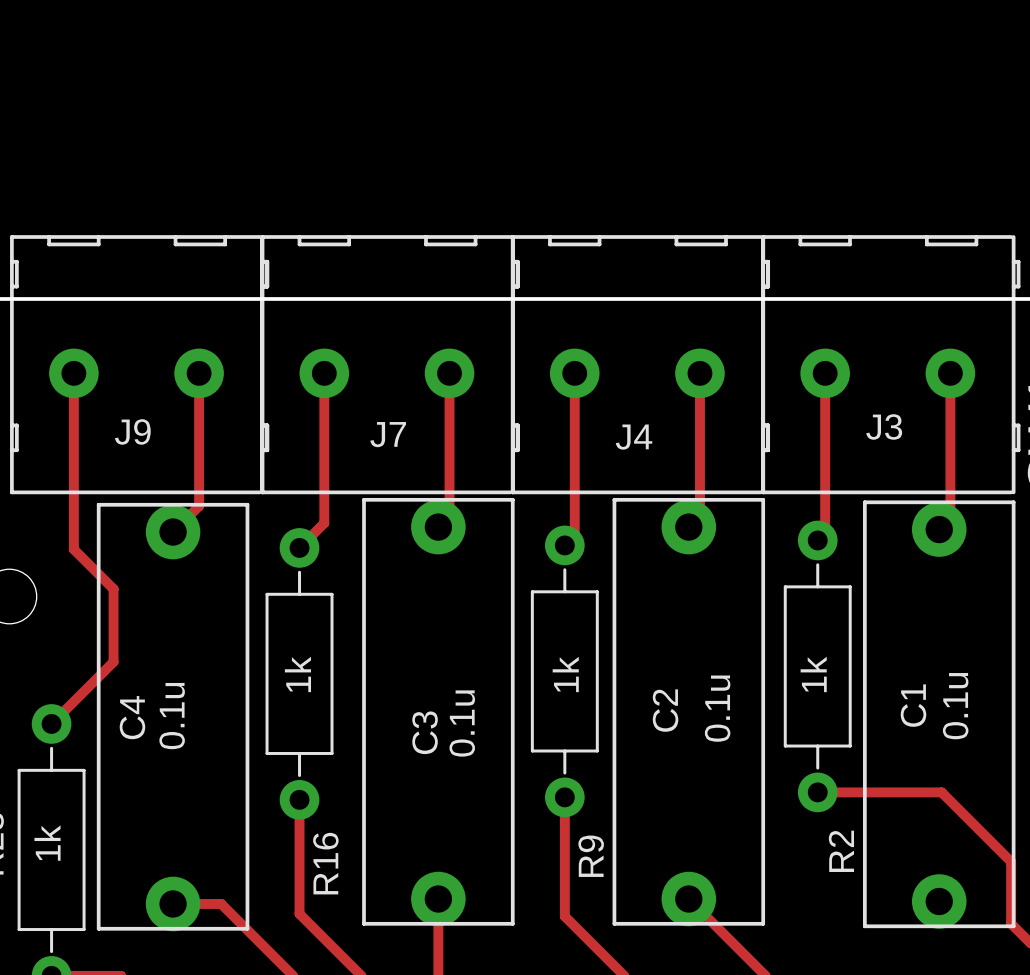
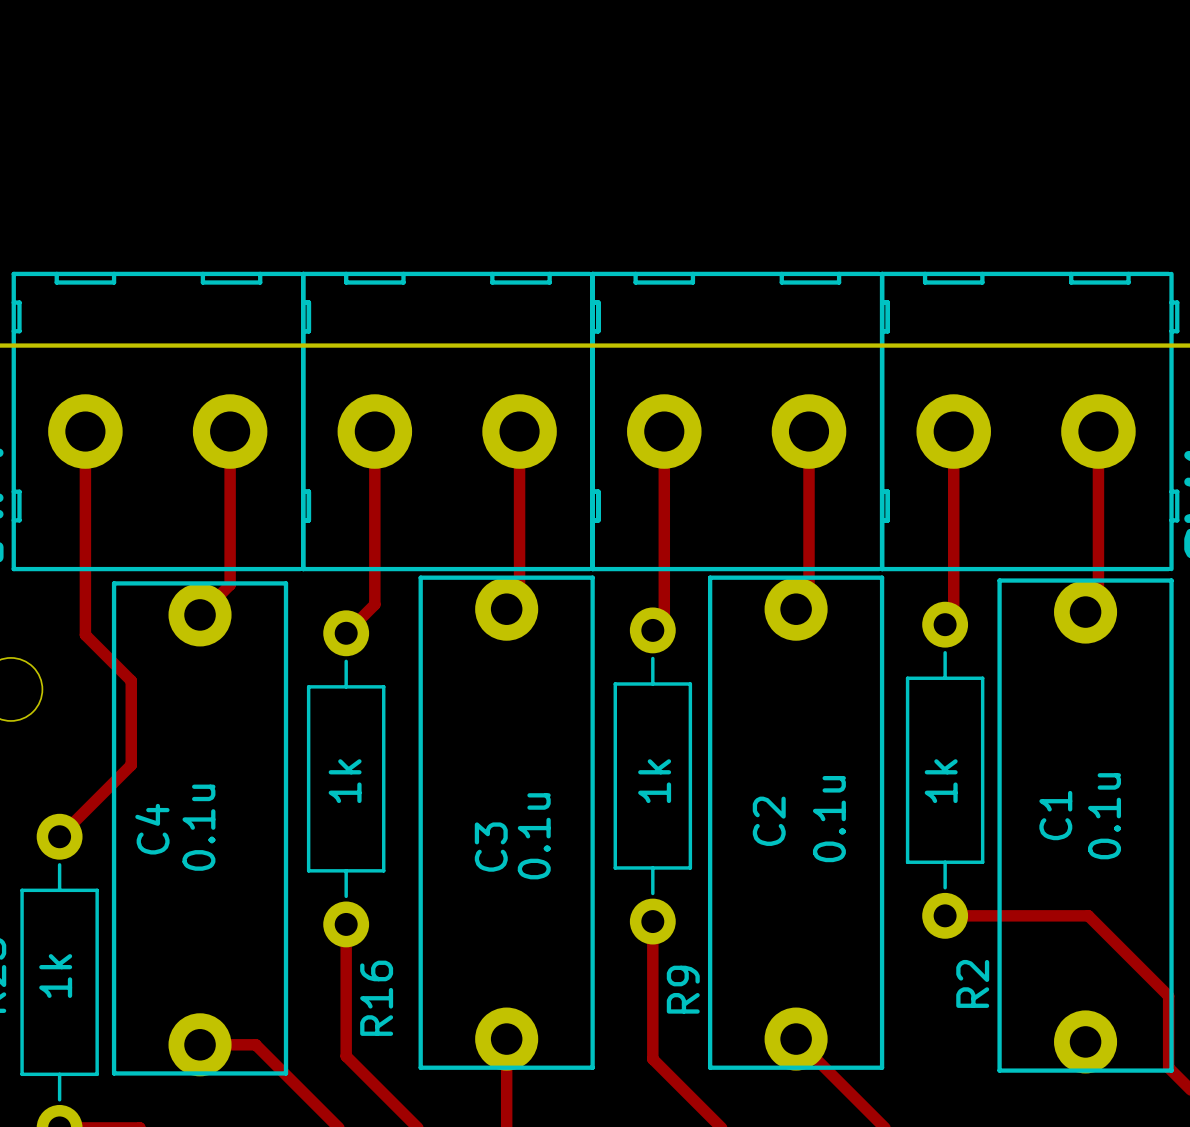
J9: (139, 364) -> none
part: none -> (161, 421)
J7: (390, 364) -> none
part: none -> (450, 421)
J4: (640, 364) -> none
part: none -> (740, 421)
J3: (890, 364) -> none
part: none -> (1029, 421)

